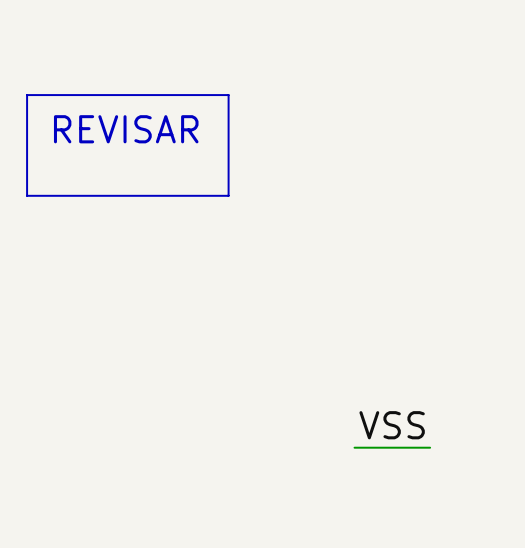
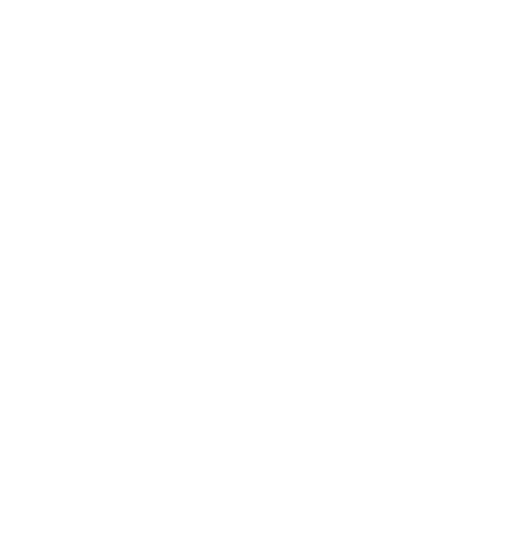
line: (27, 95) (228, 95) (228, 195) (27, 195) (27, 95) -> none
text: REVISAR (126, 129) -> none
label: VSS (392, 425) -> none
wire: (354, 447) (430, 447) -> none

